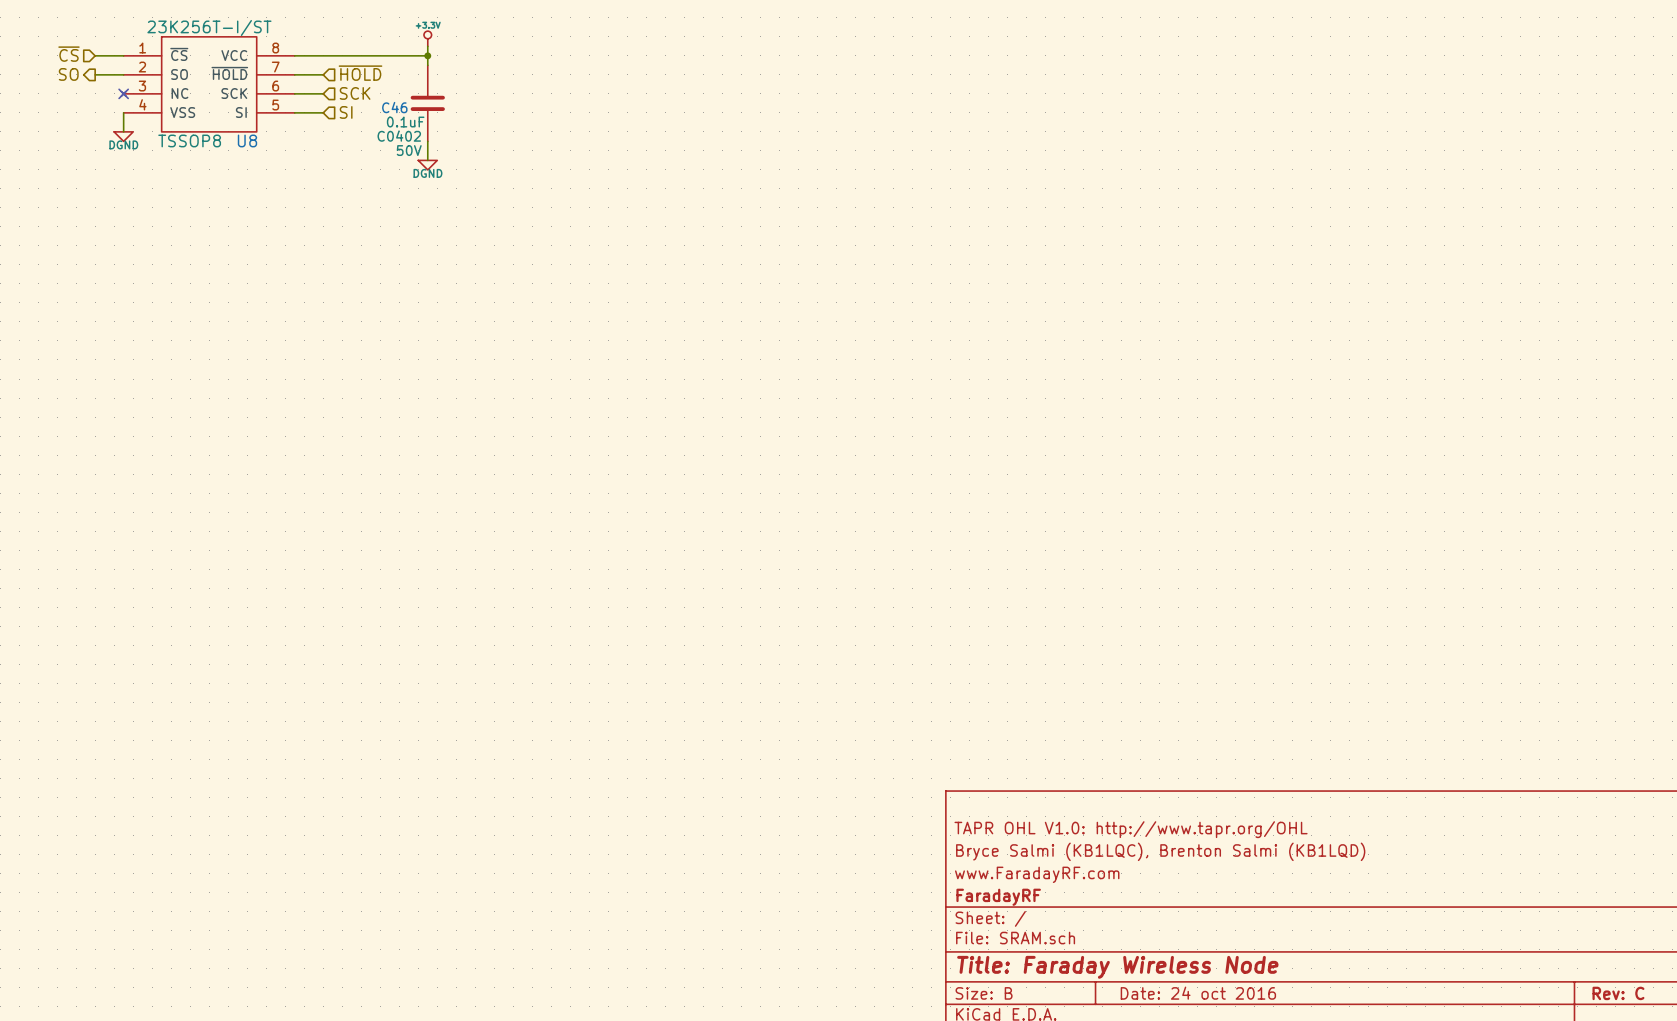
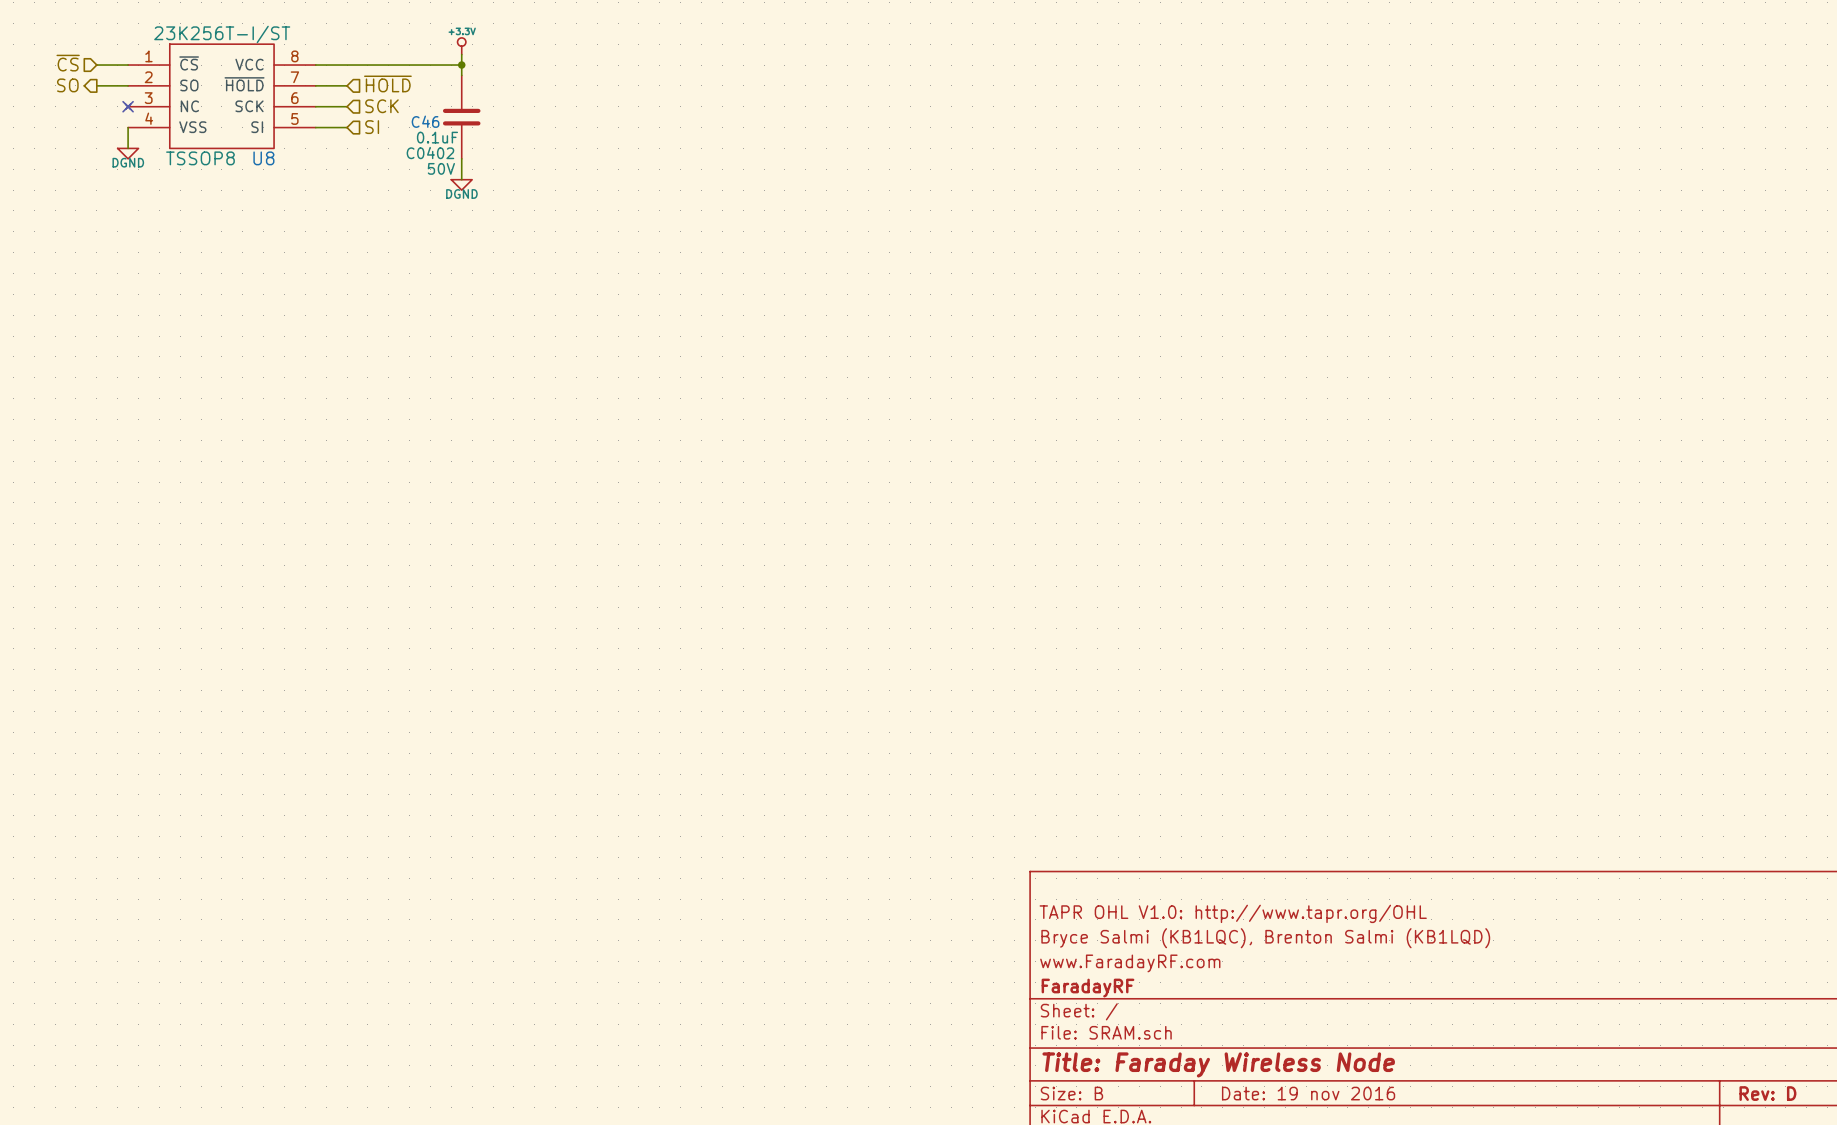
title block: Date: 24 oct 2016 (1198, 993) -> Date: 19 nov 2016 (1308, 1093)
title block: Rev: C (1618, 993) -> Rev: D (1767, 1093)

